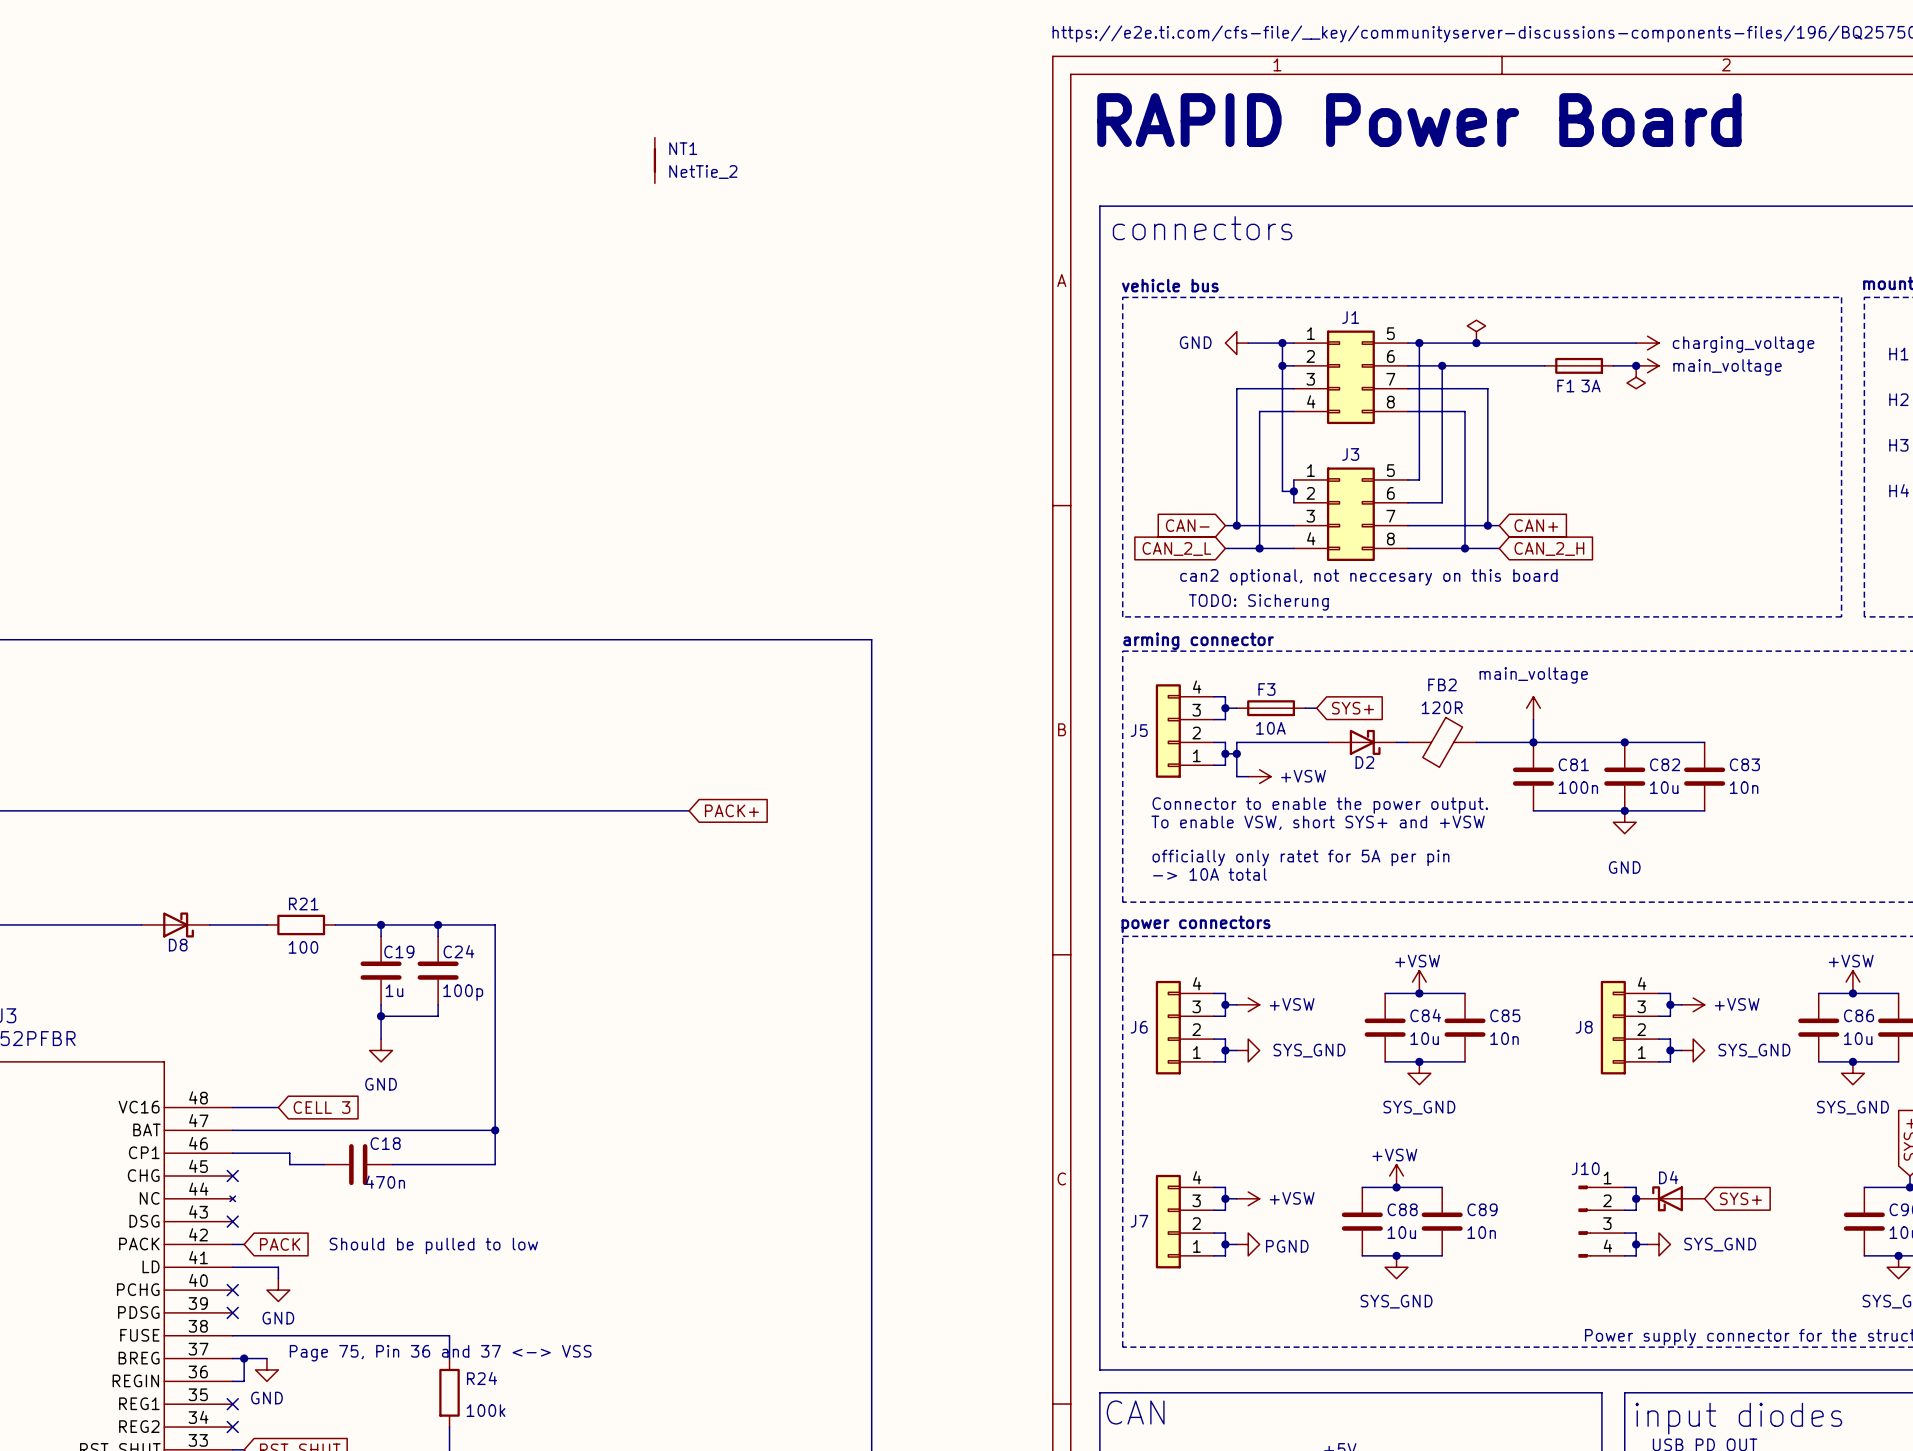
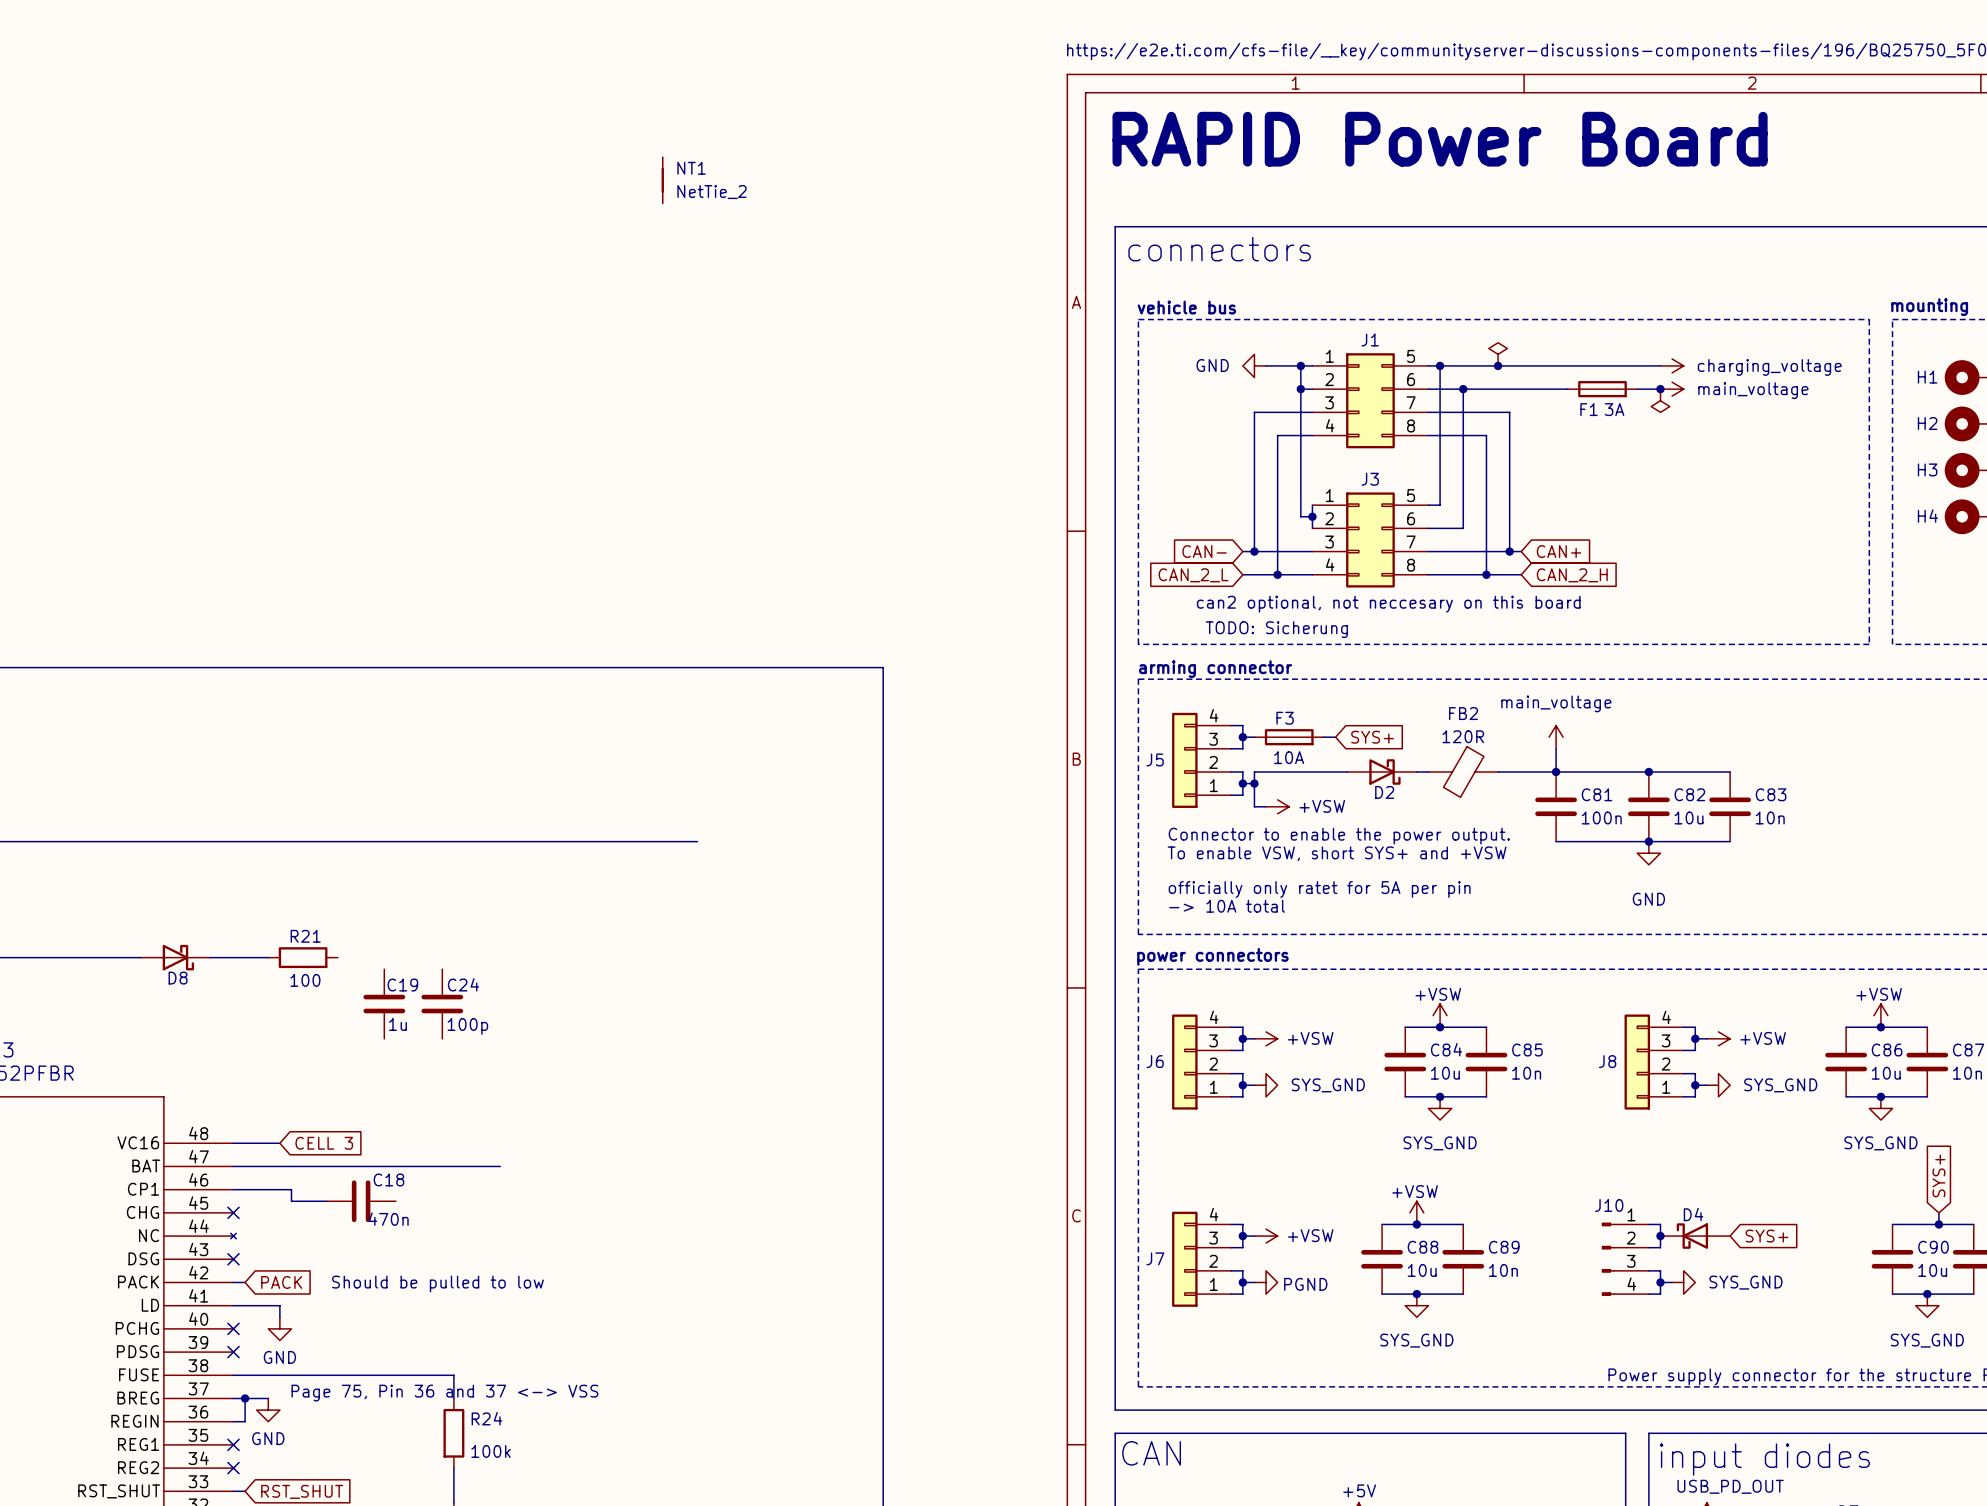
global label: PACK+ (731, 810) -> none
wire: (335, 924) (495, 924) (495, 1164) (392, 1164) -> none
wire: (381, 924) (381, 936) -> none
junction: (381, 924) -> none
wire: (438, 924) (438, 936) -> none
junction: (438, 924) -> none
wire: (381, 1004) (381, 1039) -> none
wire: (438, 1004) (438, 1016) (381, 1016) -> none
junction: (381, 1016) -> none
power symbol: GND (381, 1050) -> none
junction: (495, 1130) -> none

